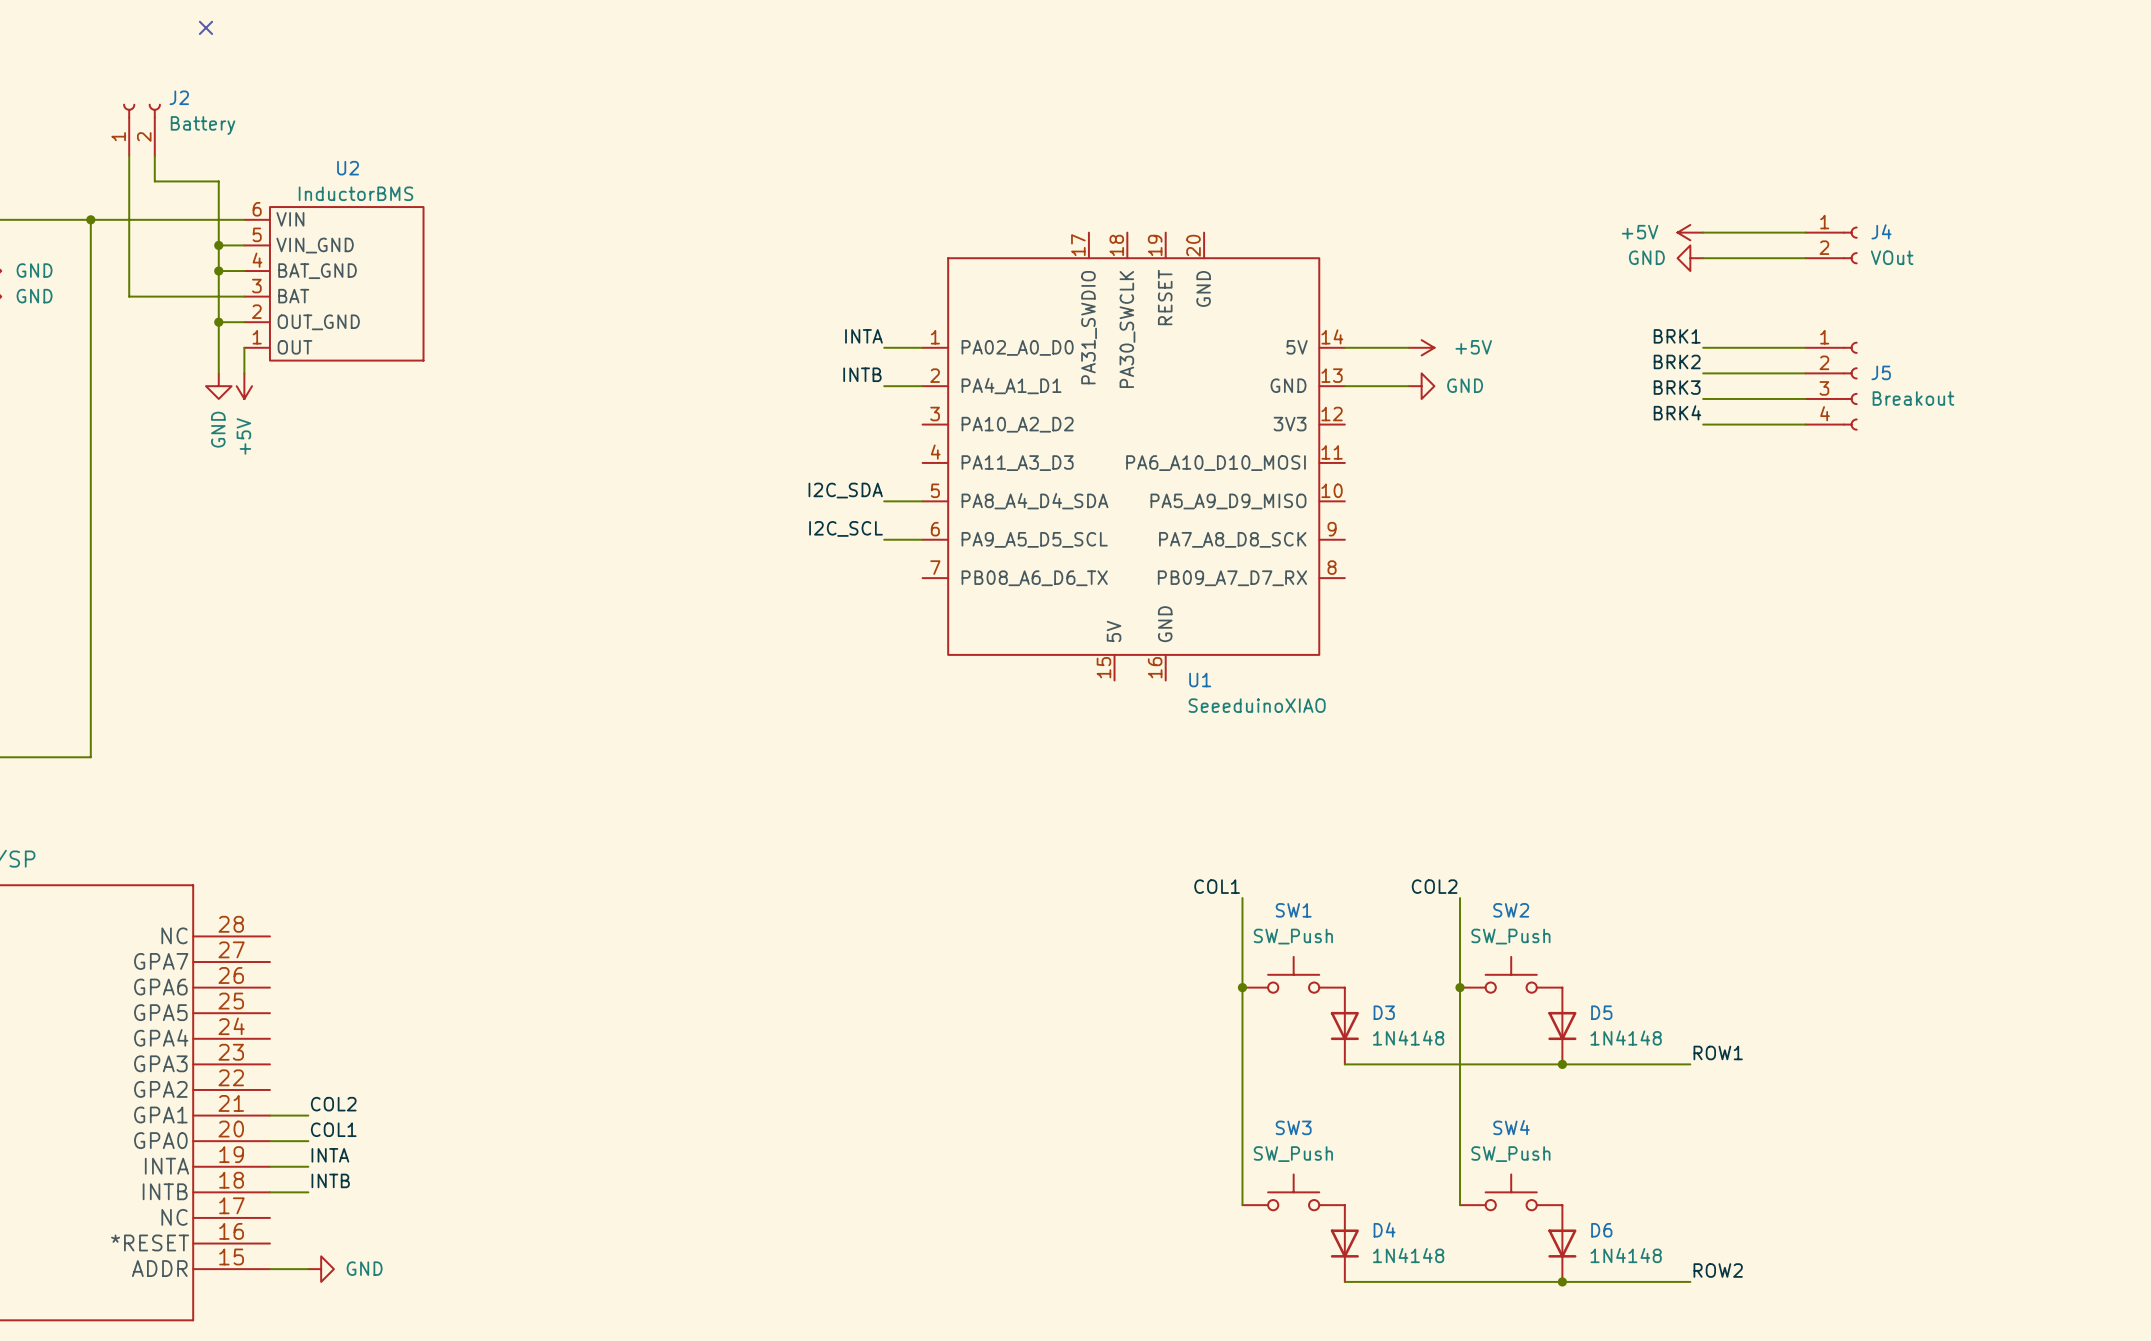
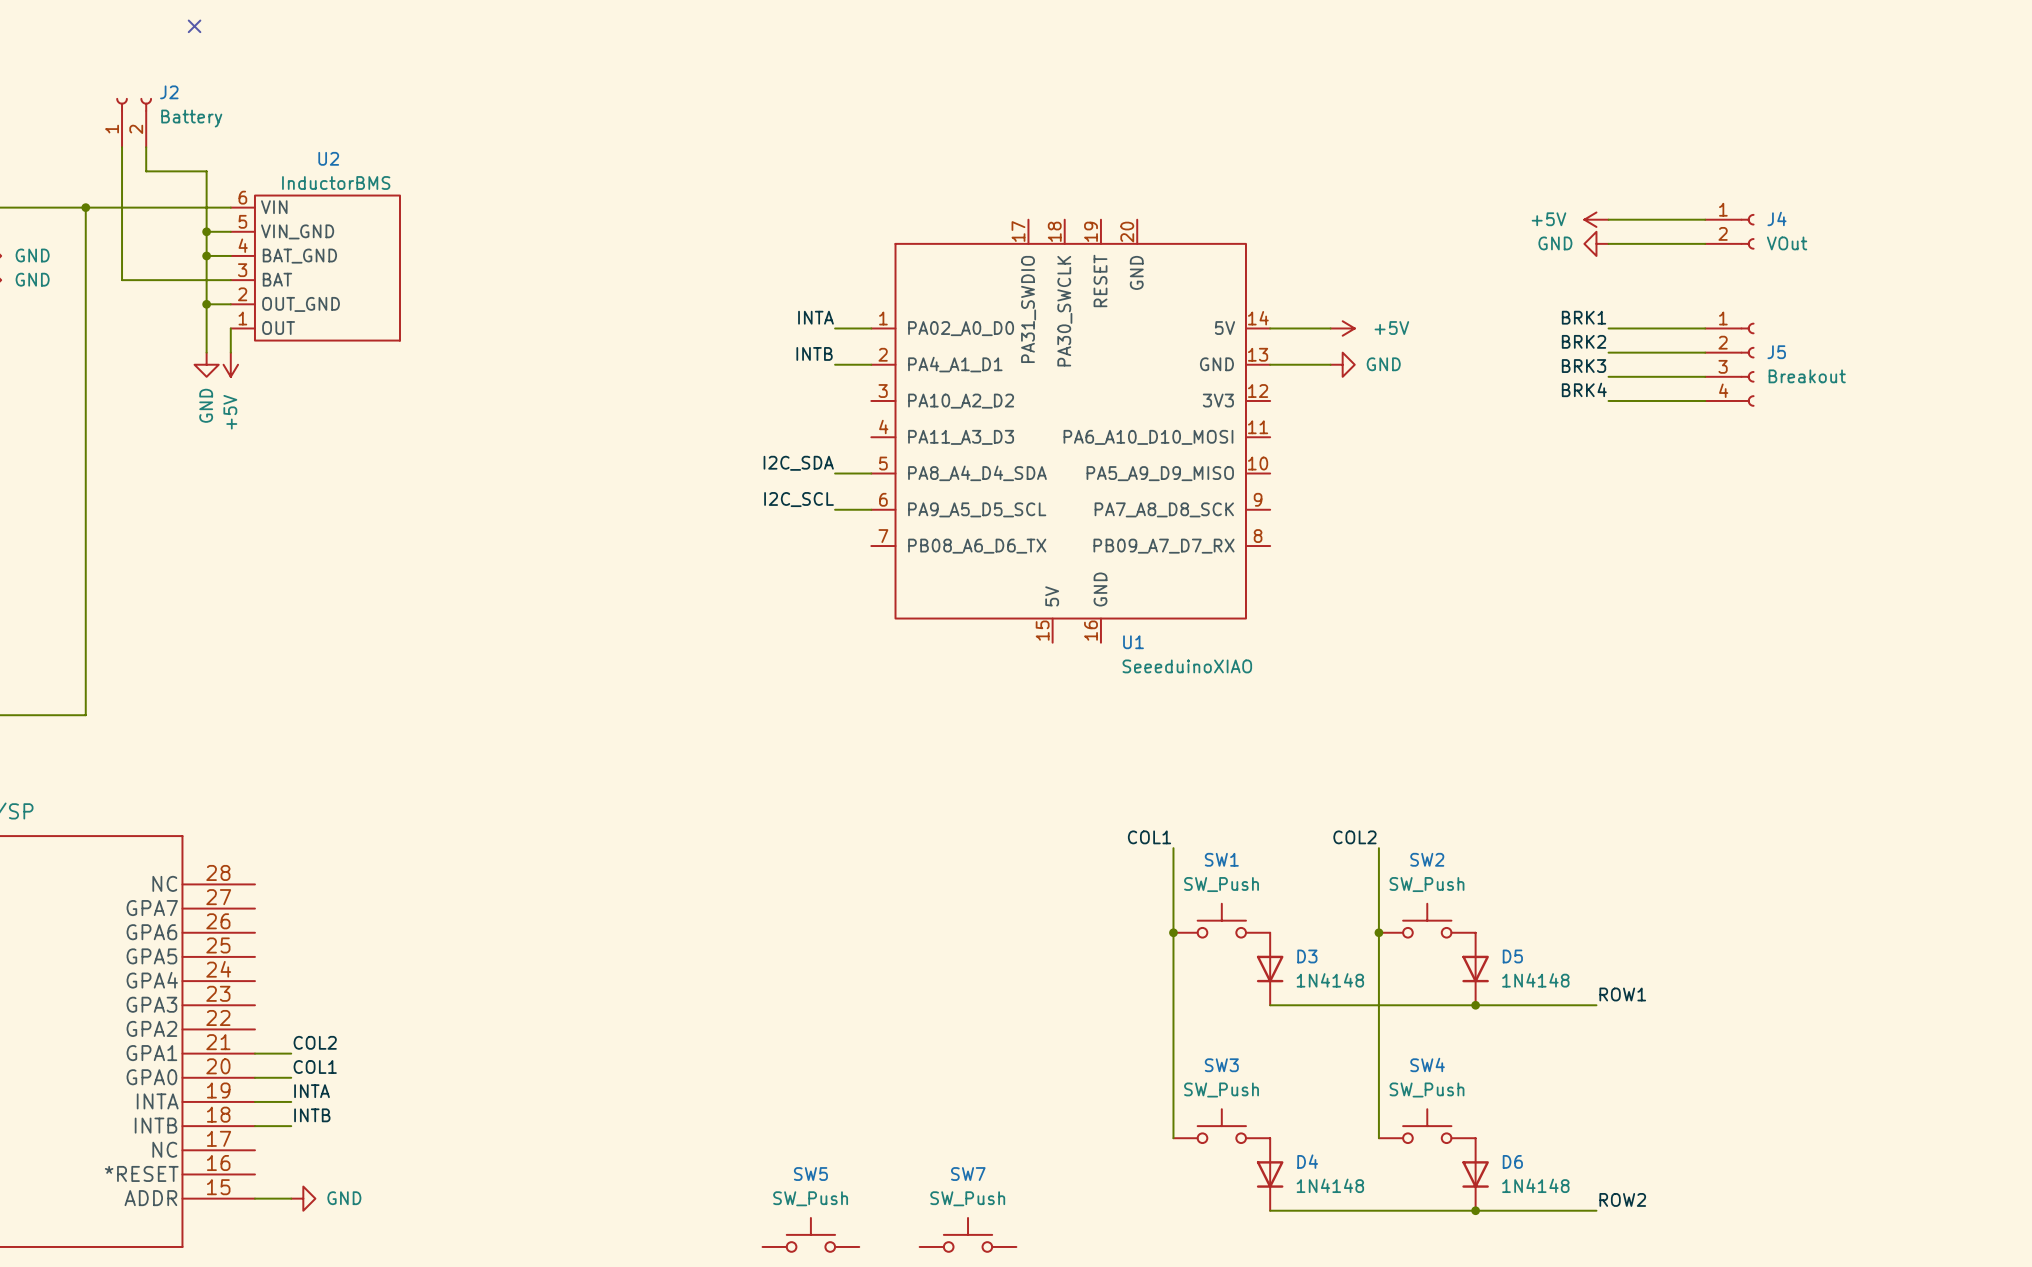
SW5: none -> SW_Push (810, 1234)
SW7: none -> SW_Push (968, 1234)

